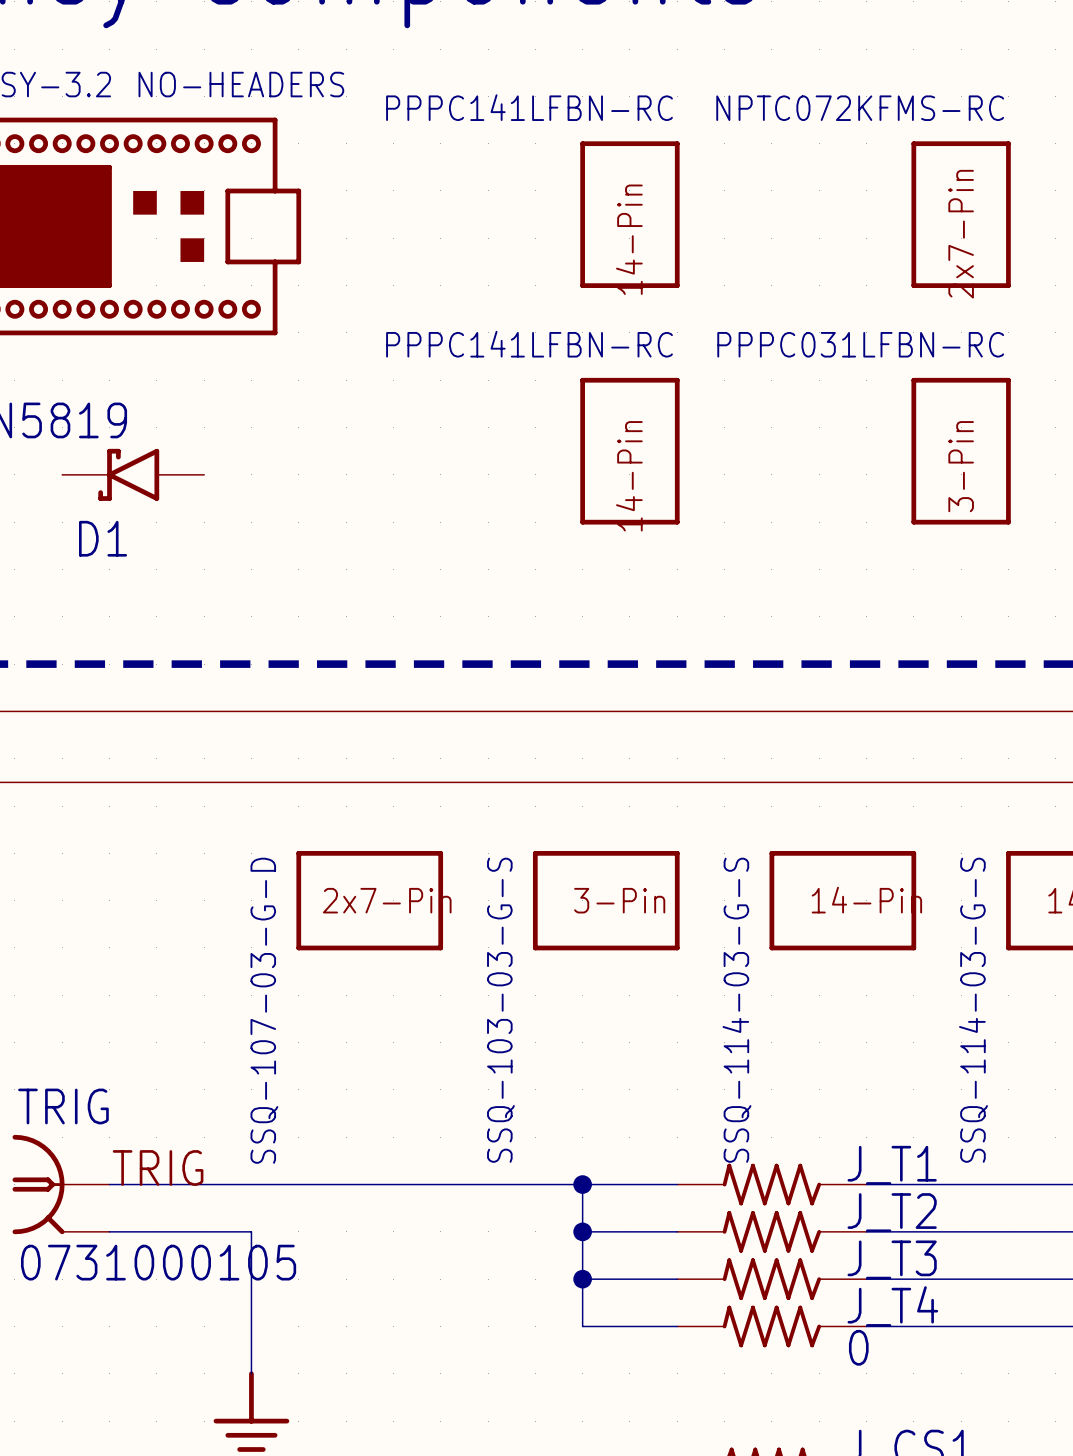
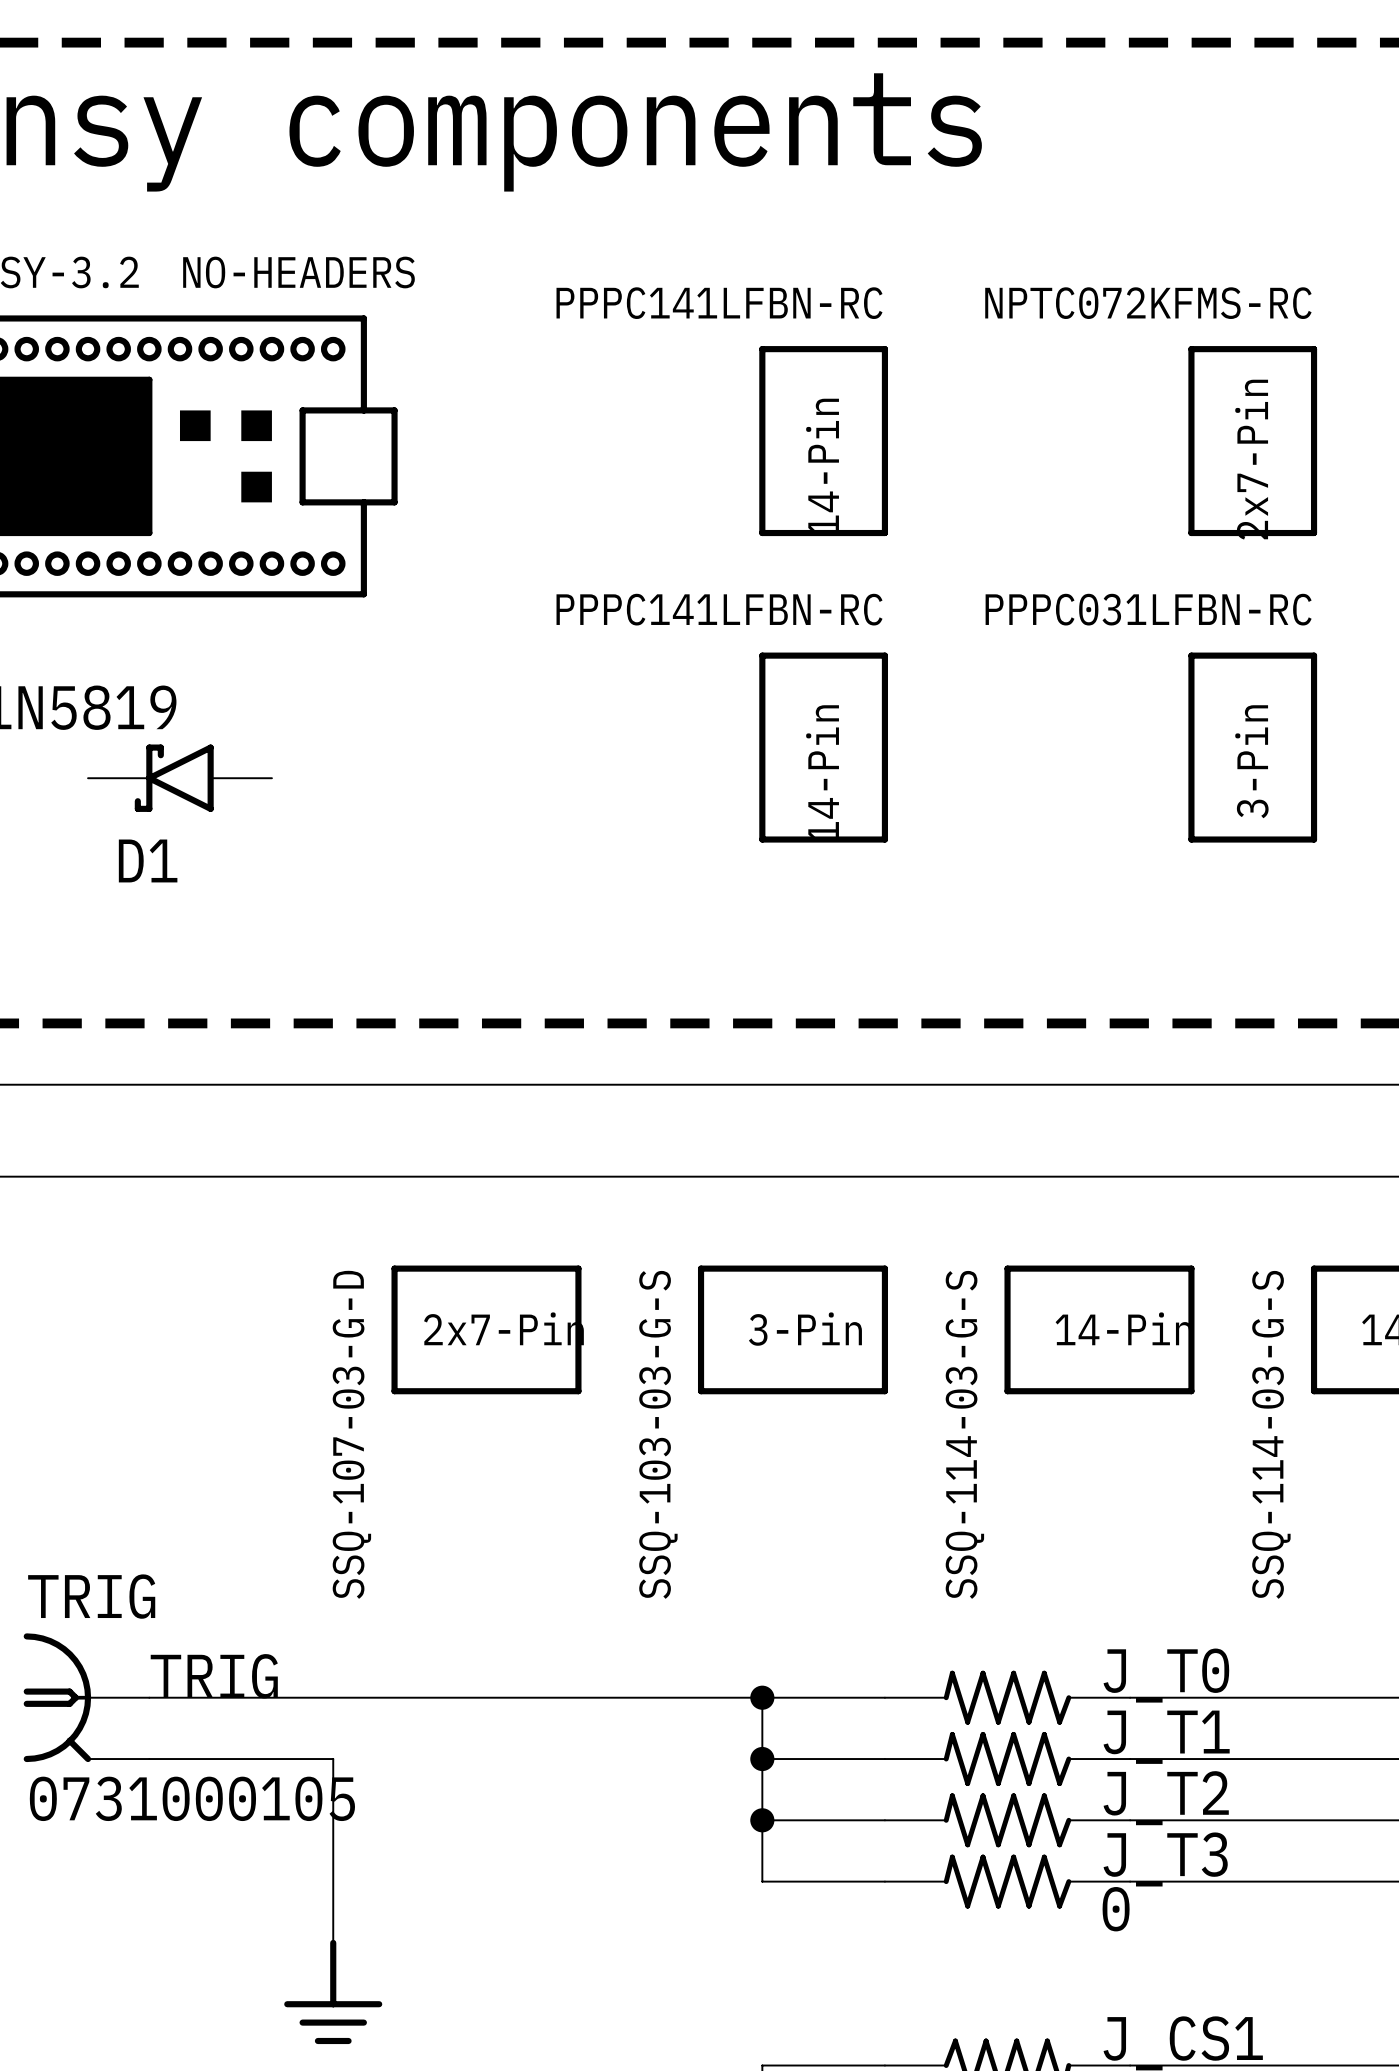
J_T1 name: J_T1 (892, 1165) -> J_T0 (1166, 1675)
J_T2 name: J_T2 (892, 1212) -> J_T1 (1166, 1737)
J_T3 name: J_T3 (892, 1259) -> J_T2 (1166, 1798)
J_T4 name: J_T4 (892, 1306) -> J_T3 (1165, 1859)

